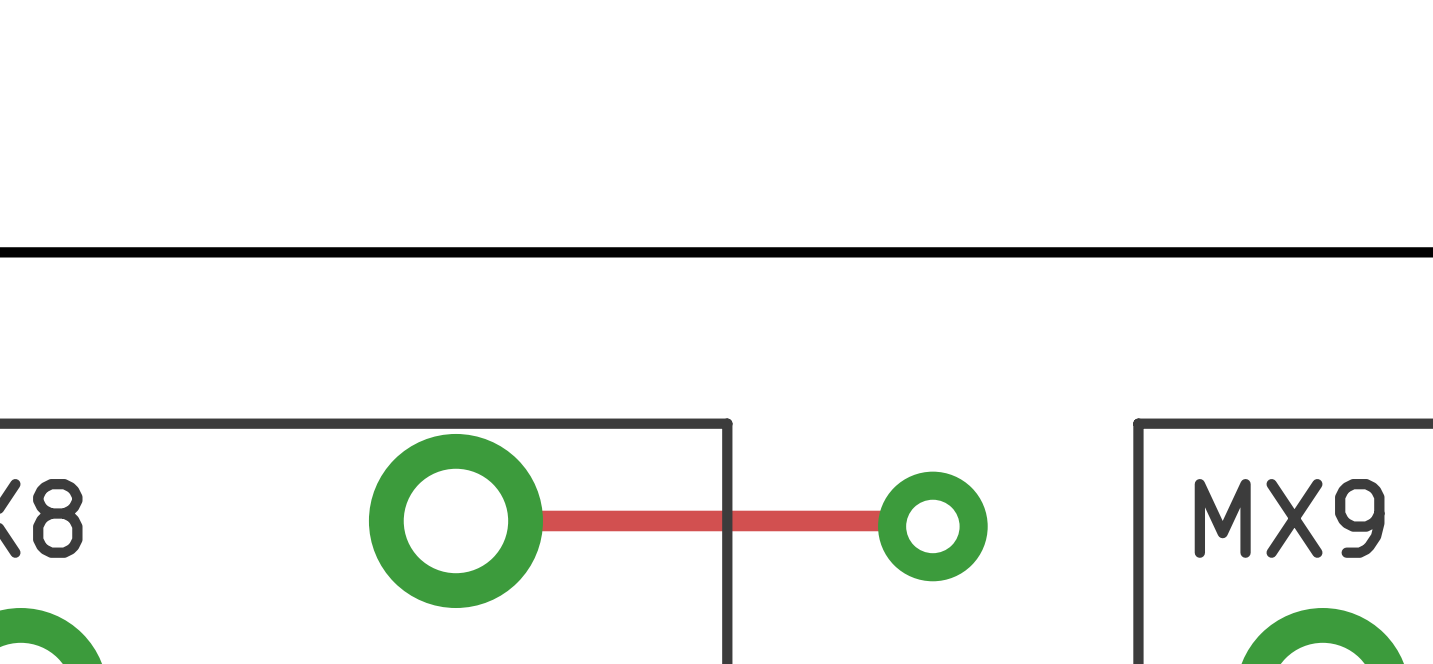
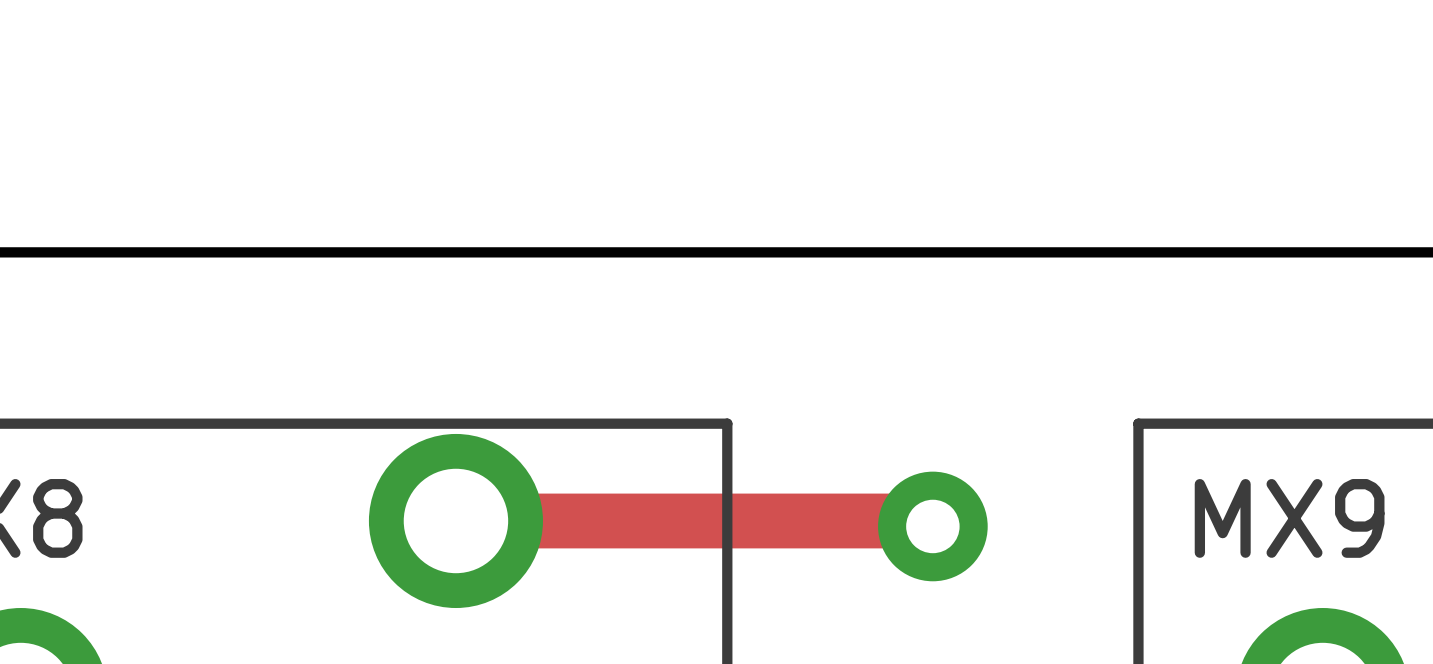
track width: thin (455, 520) (927, 520) (932, 526) -> thick (455, 520) (927, 520) (932, 526)

